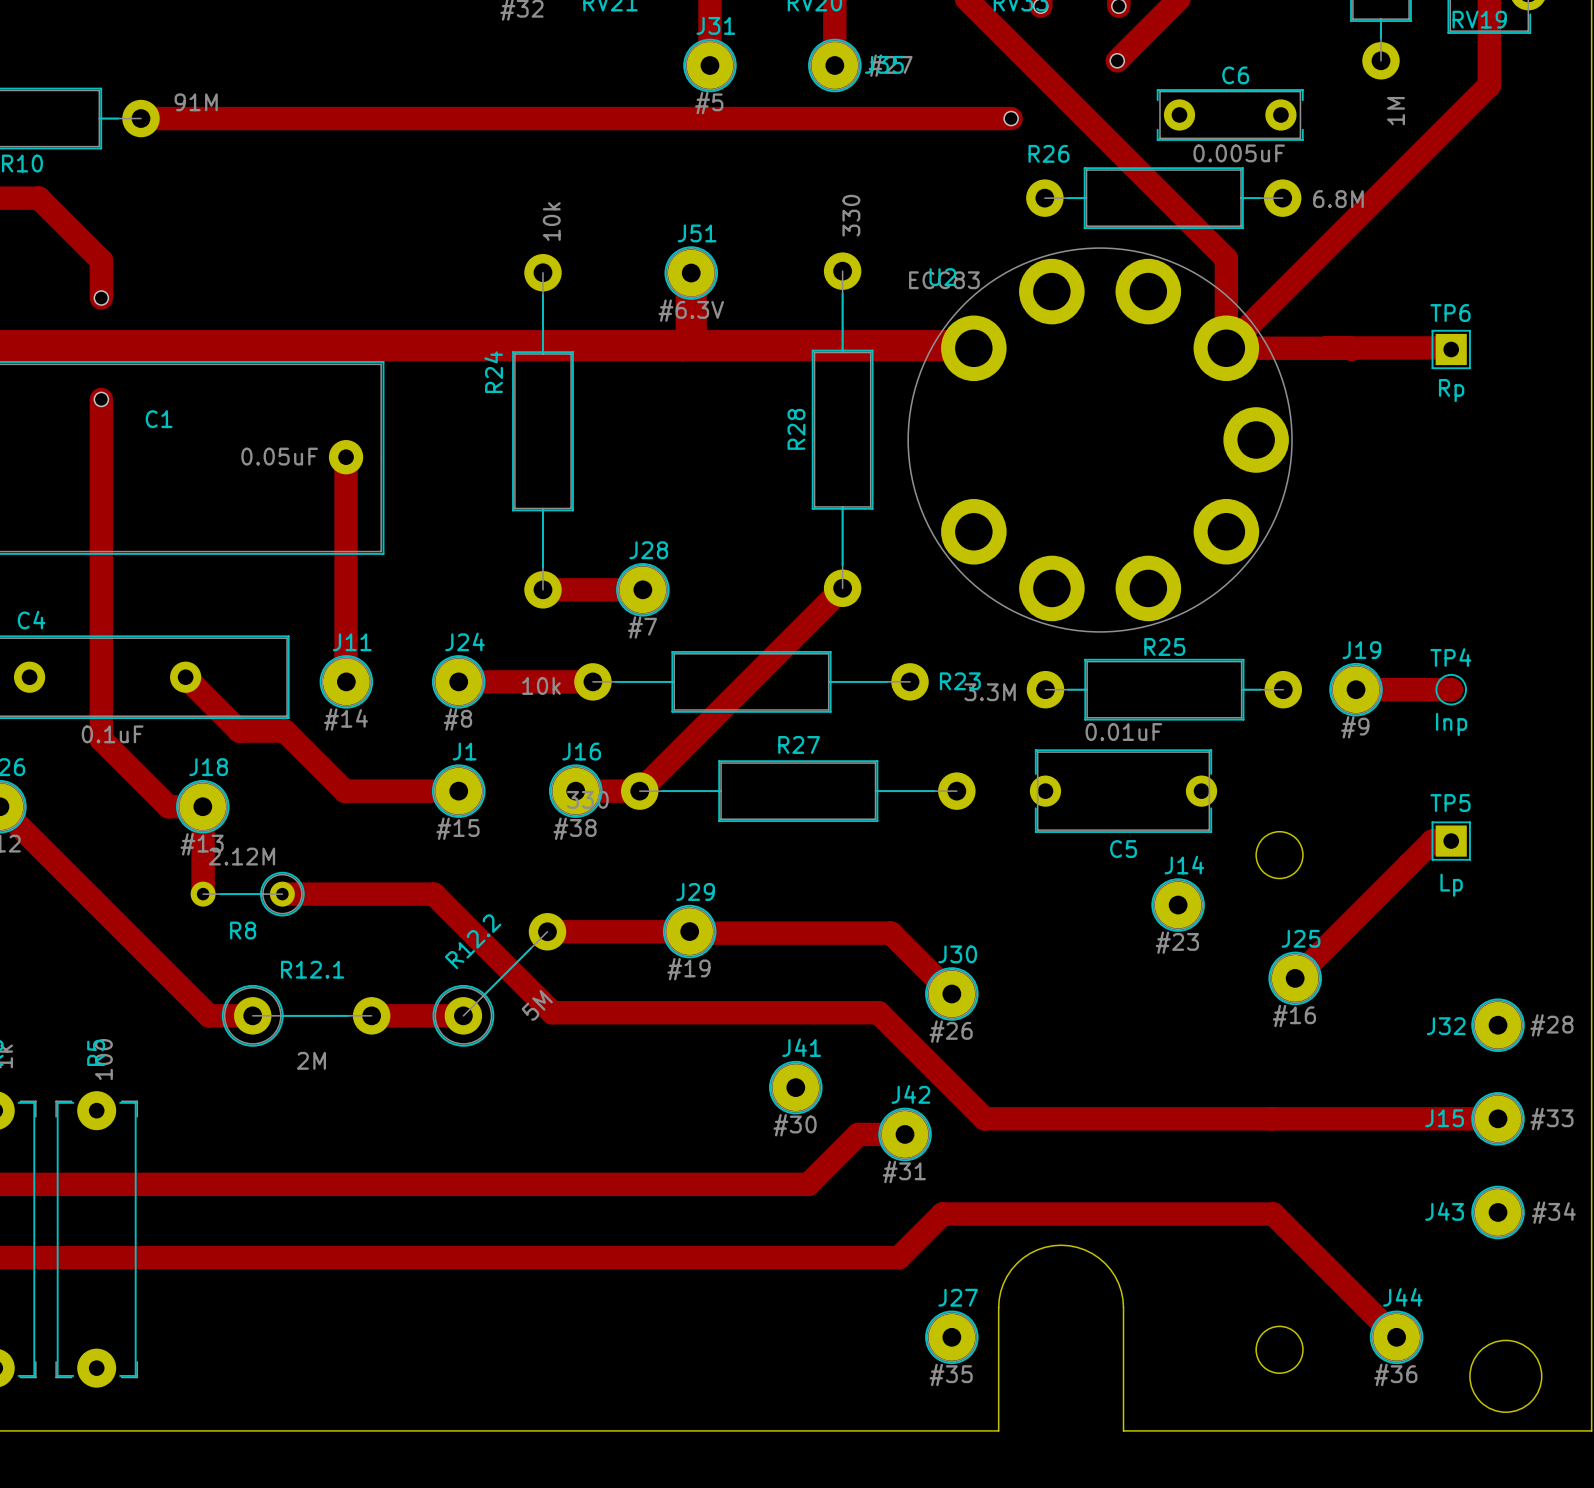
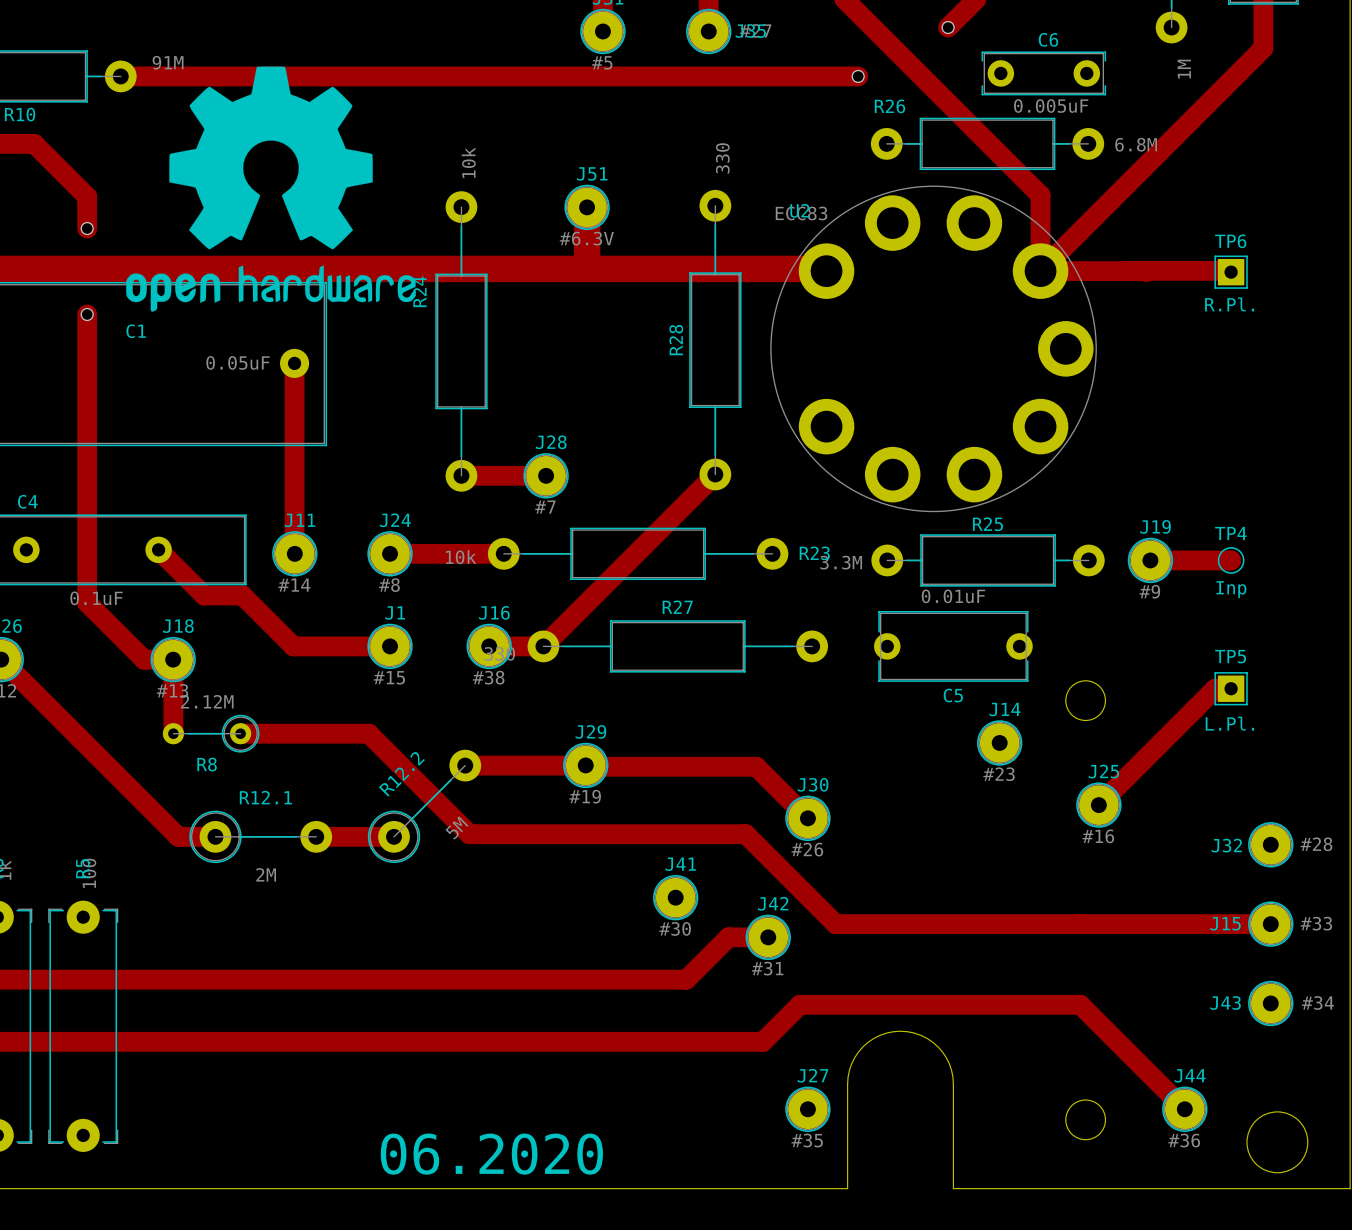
drawing: none -> [126, 66, 416, 312]
TP6 value: Rp (1451, 390) -> R.Pl. (1229, 304)
TP5 value: Lp (1451, 885) -> L.Pl. (1229, 723)
text: none -> 06.2020 (491, 1154)

